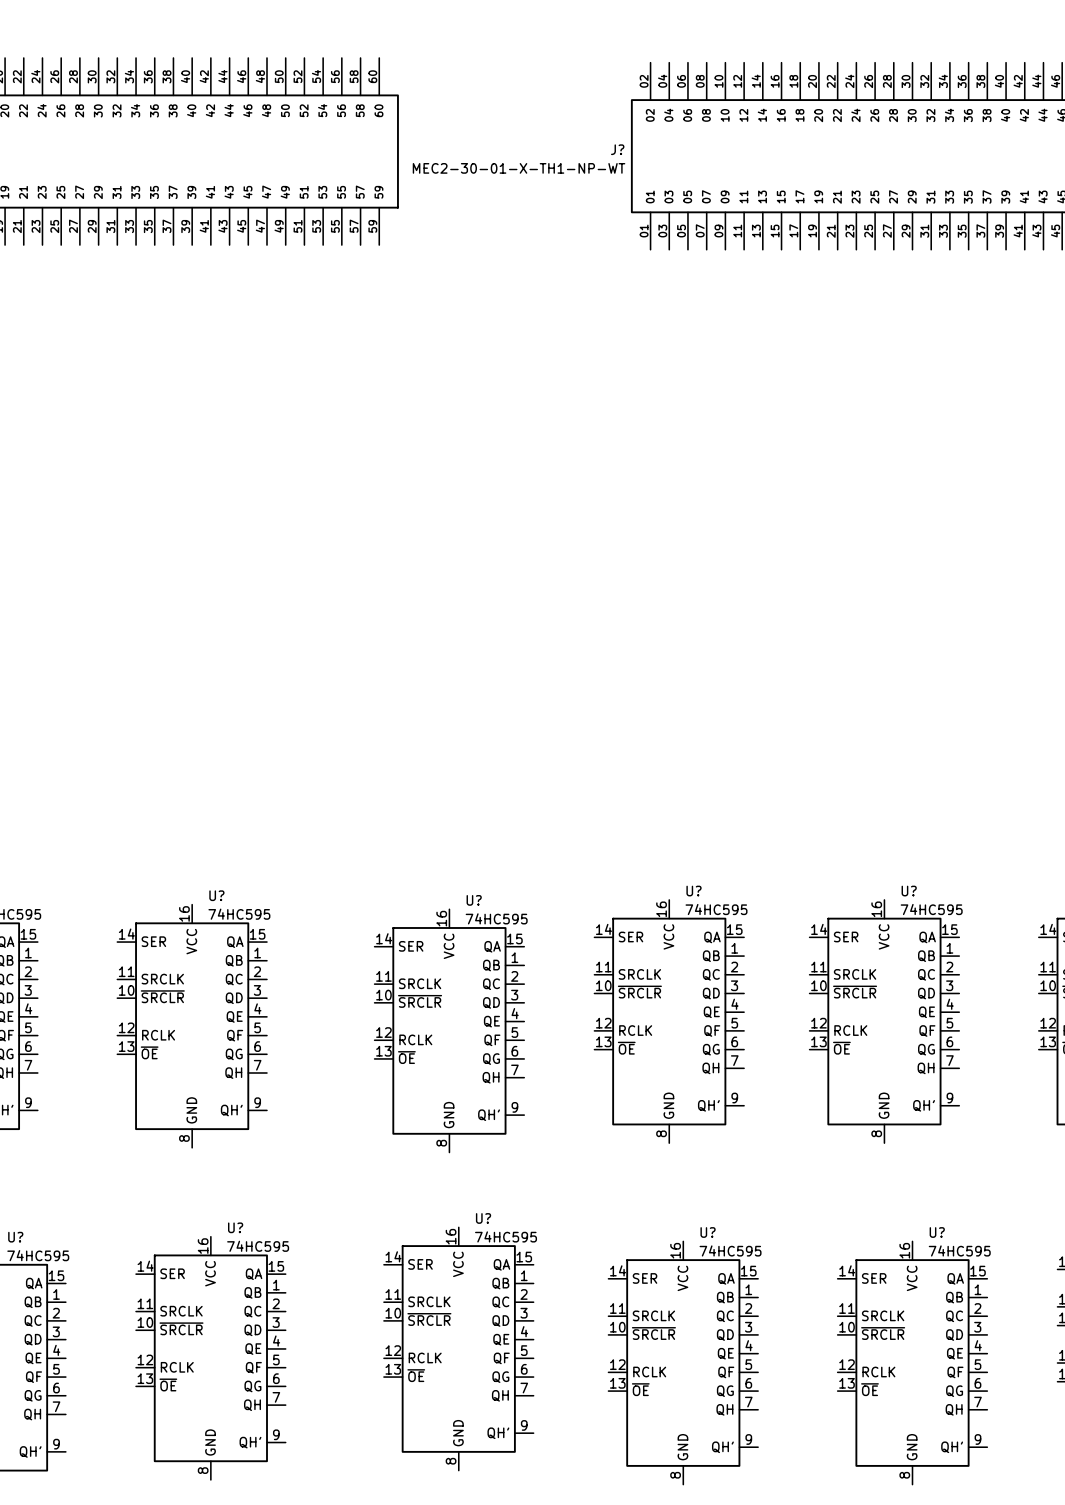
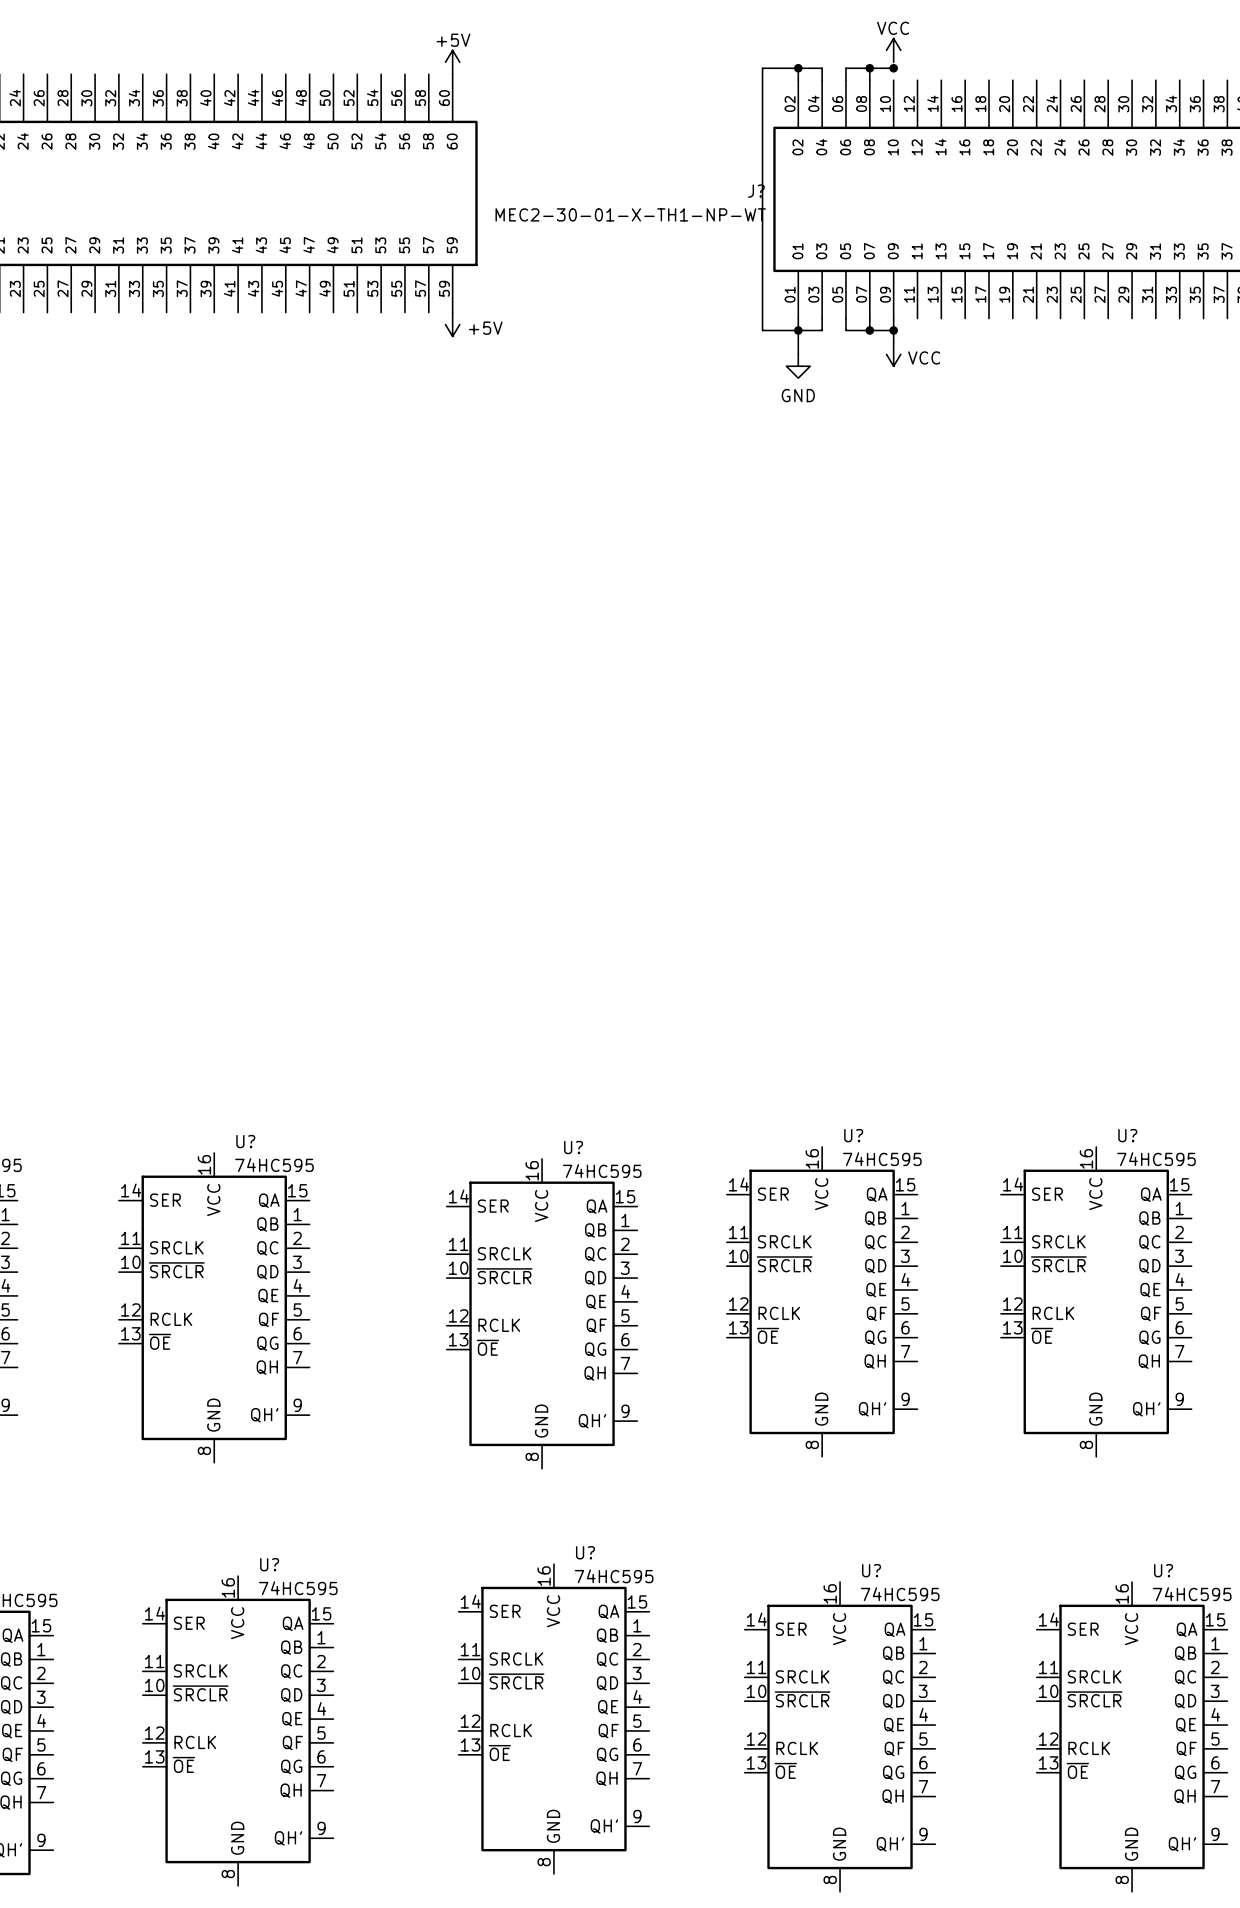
power symbol: none -> VCC (893, 50)
power symbol: none -> +5V (452, 62)
wire: none -> (798, 68) (798, 80)
junction: none -> (798, 68)
wire: none -> (869, 68) (869, 80)
junction: none -> (869, 68)
wire: none -> (893, 68) (845, 68) (845, 80)
junction: none -> (893, 68)
wire: none -> (822, 80) (822, 68) (762, 68) (762, 330) (822, 330) (822, 318)
wire: none -> (798, 318) (798, 354)
wire: none -> (845, 318) (845, 330) (893, 330)
wire: none -> (869, 318) (869, 330)
wire: none -> (893, 318) (893, 342)
power symbol: none -> +5V (452, 324)
junction: none -> (798, 330)
junction: none -> (869, 330)
junction: none -> (893, 330)
power symbol: none -> VCC (893, 354)
power symbol: none -> GND (798, 366)

